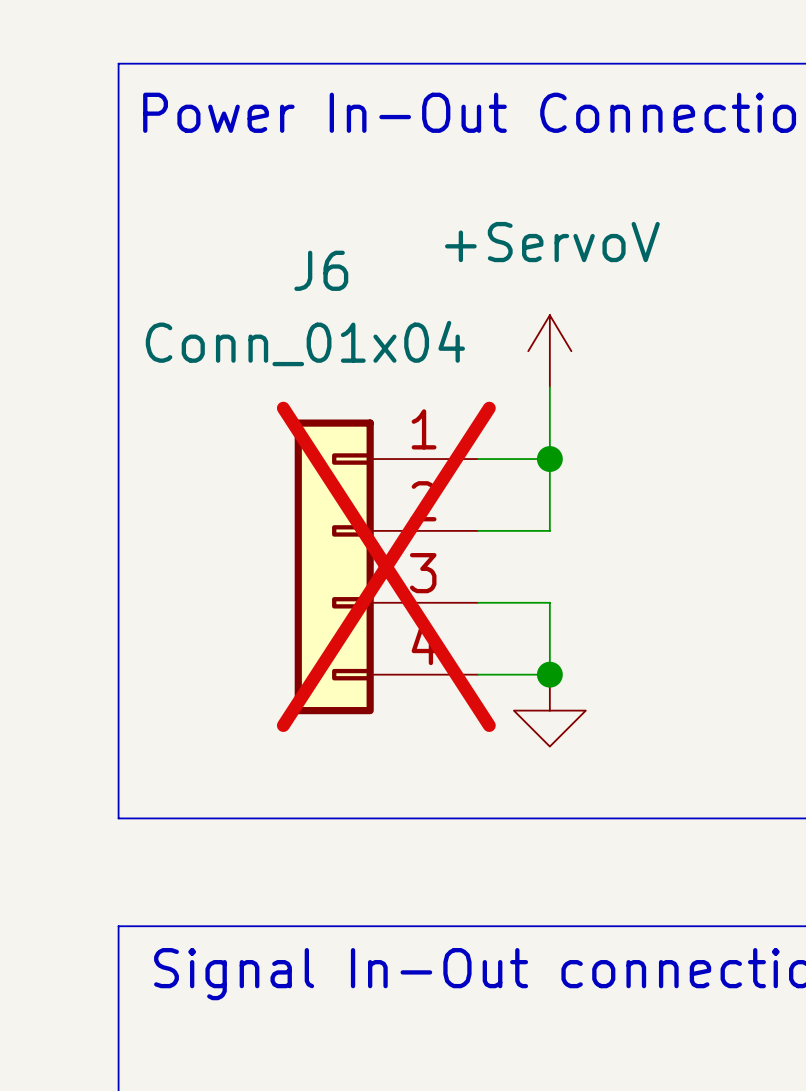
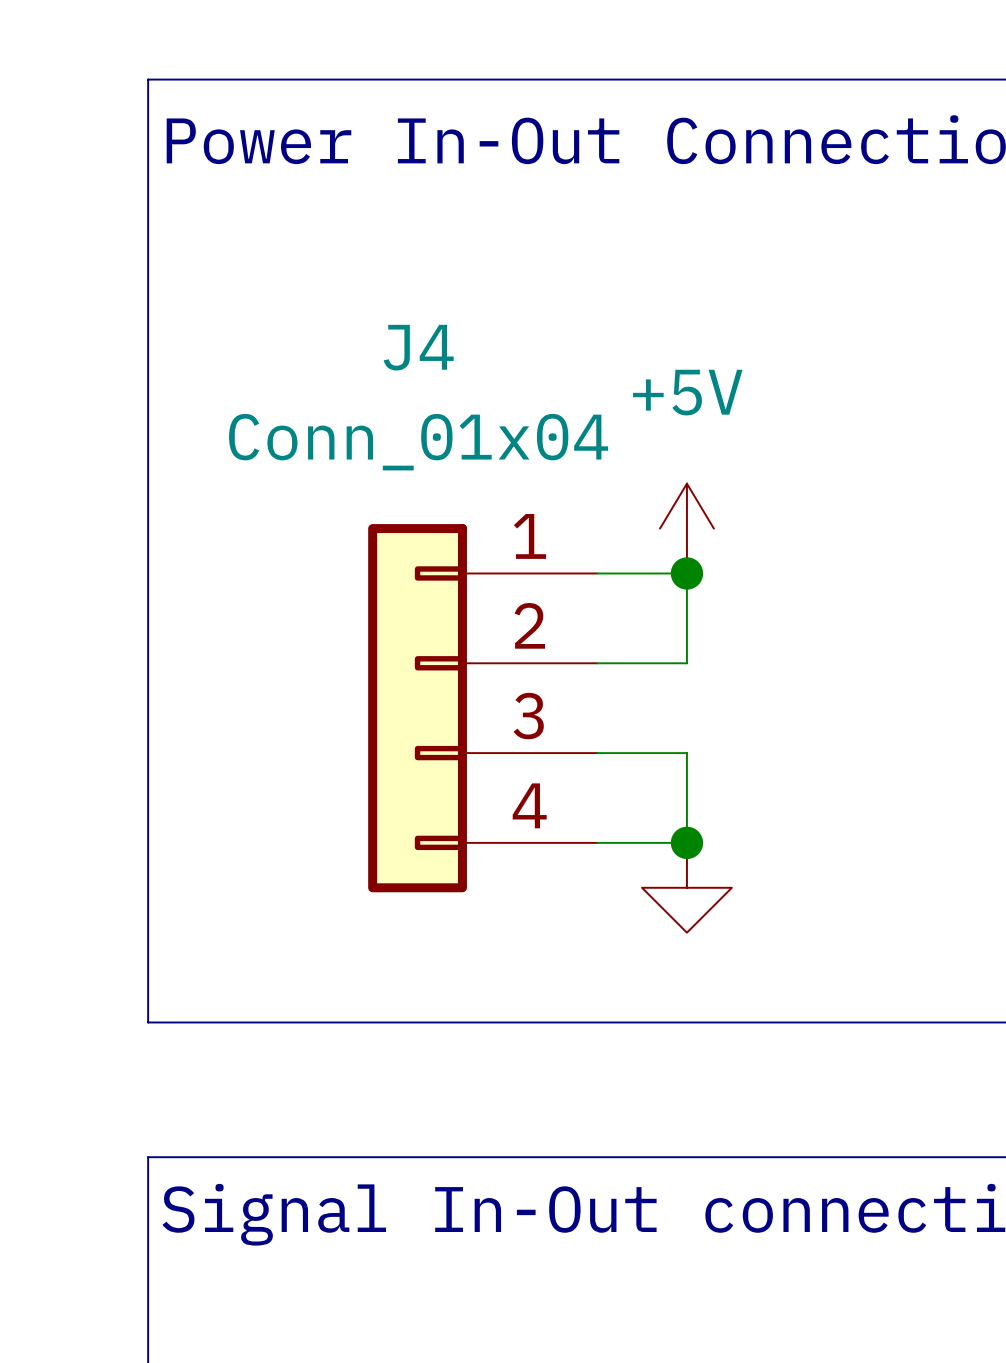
J6 name: J6 (321, 270) -> J4 (418, 347)
J6 value position: Conn_01x04 (305, 343) -> Conn_01x04 (418, 442)
power symbol: +ServoV (549, 351) -> none
power symbol: none -> +5V (686, 528)
J6 do-not-place cross: (386, 566) -> none

